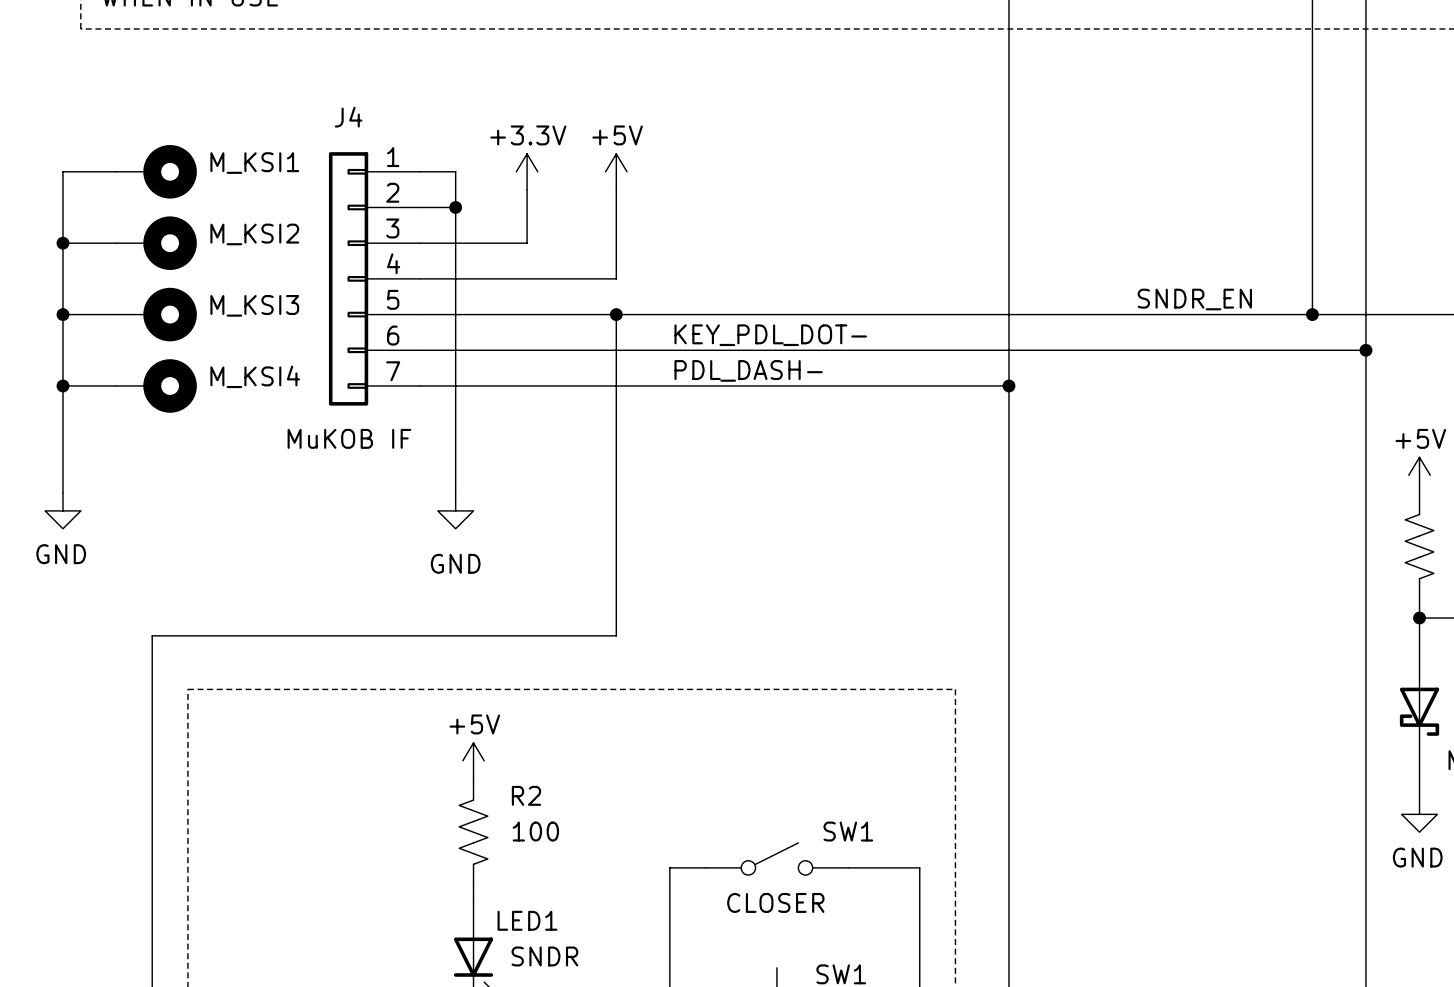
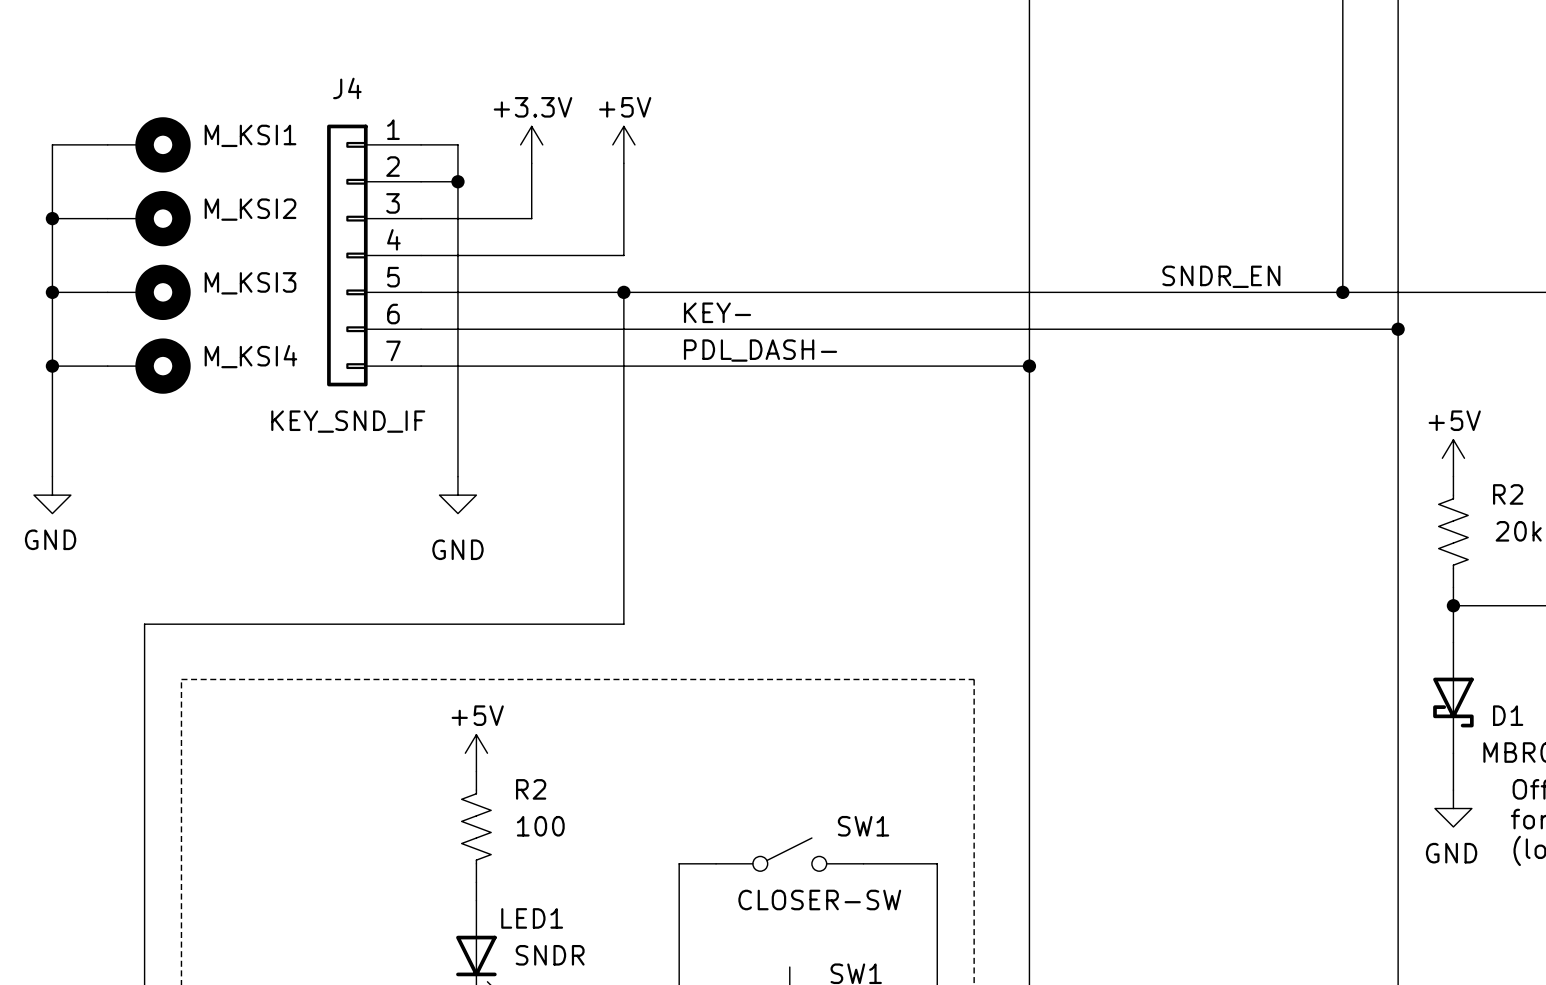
label: KEY_PDL_DOT- (770, 335) -> KEY- (717, 312)
J4 value: MuKOB IF (349, 438) -> KEY_SND_IF (348, 421)
SW1 value: CLOSER (775, 902) -> CLOSER-SW (819, 900)

